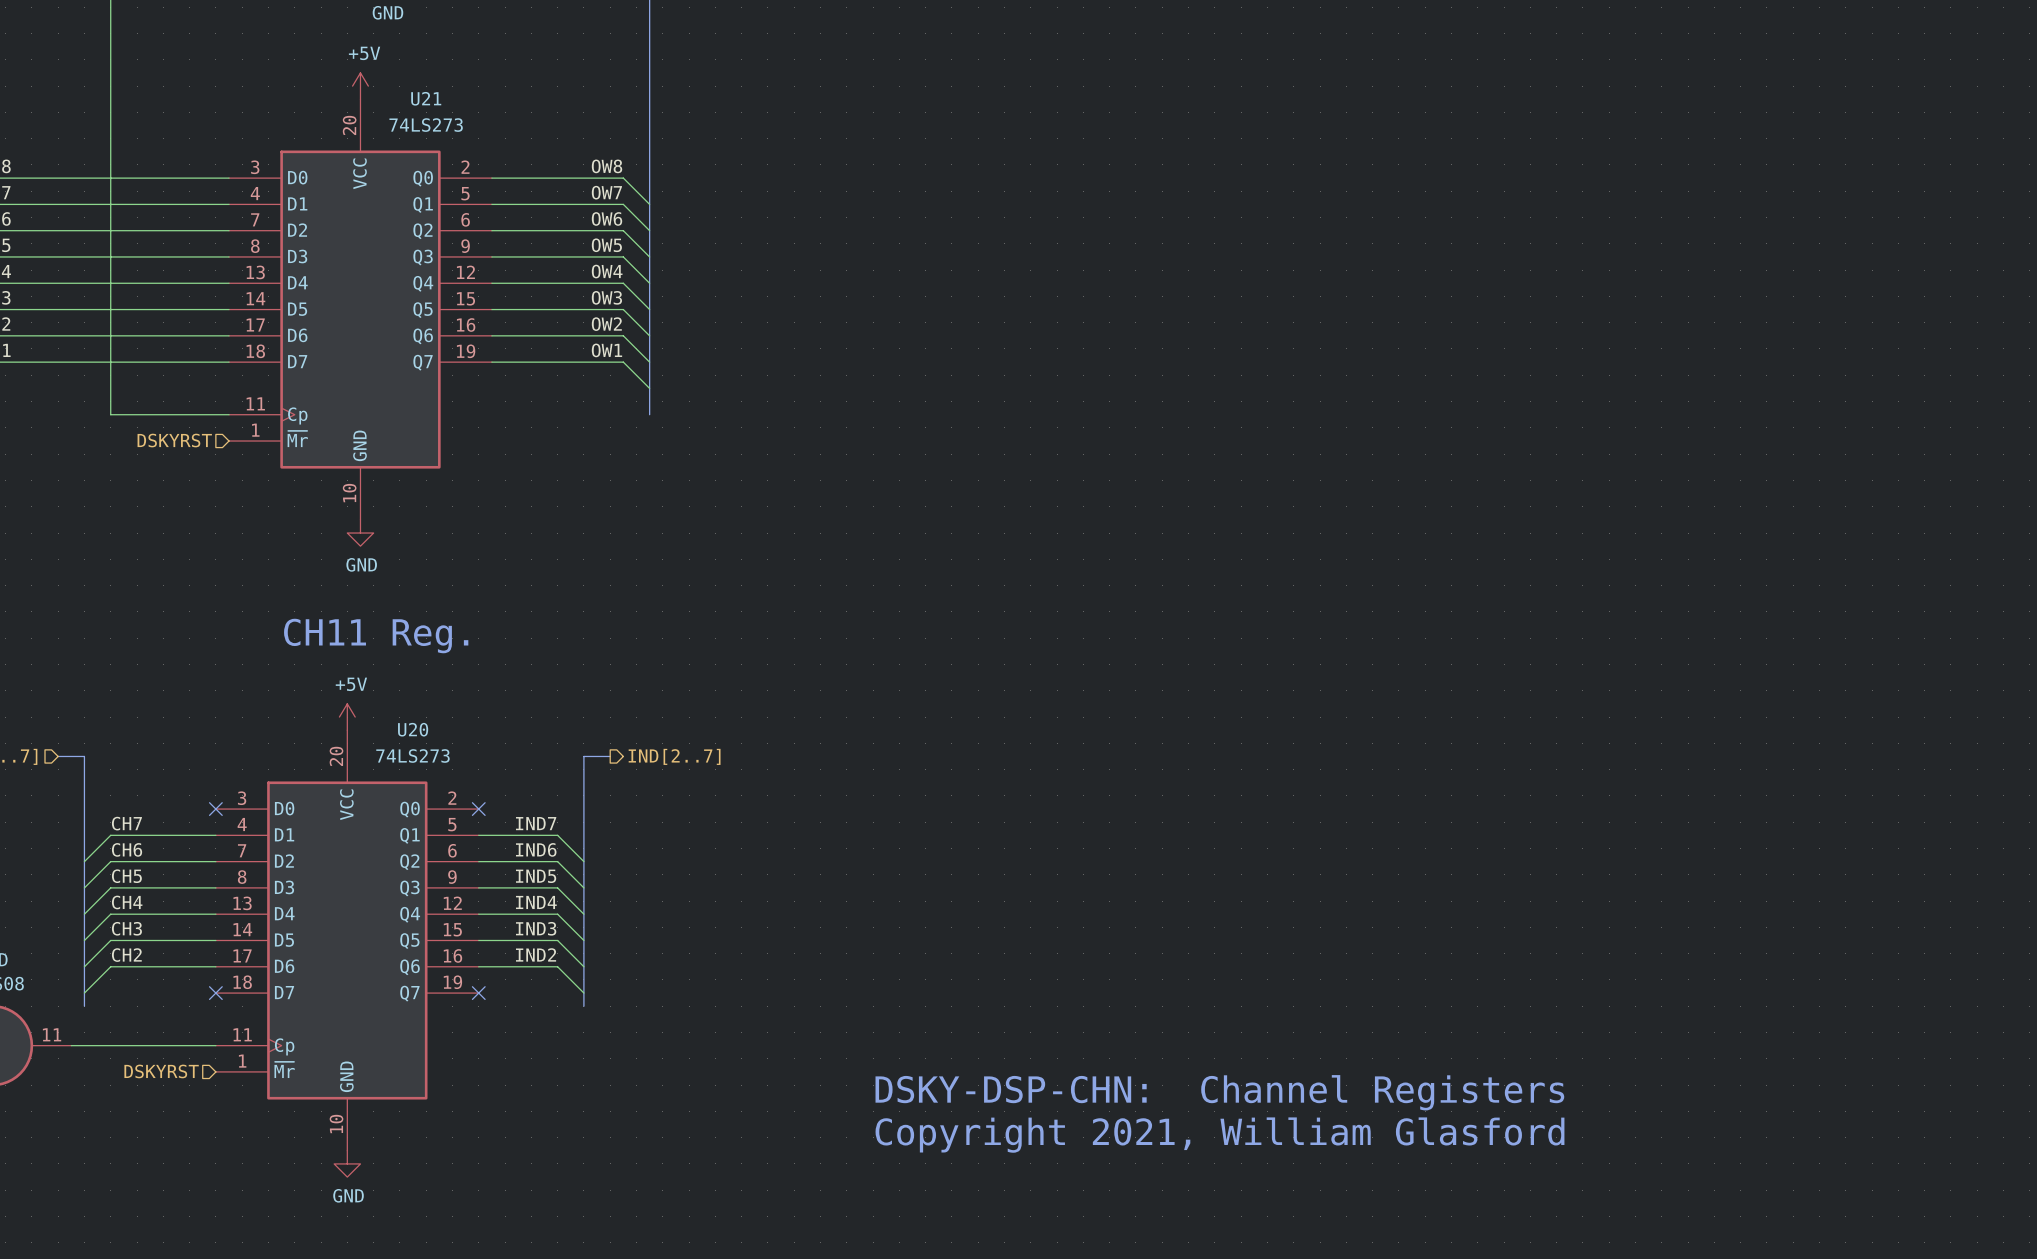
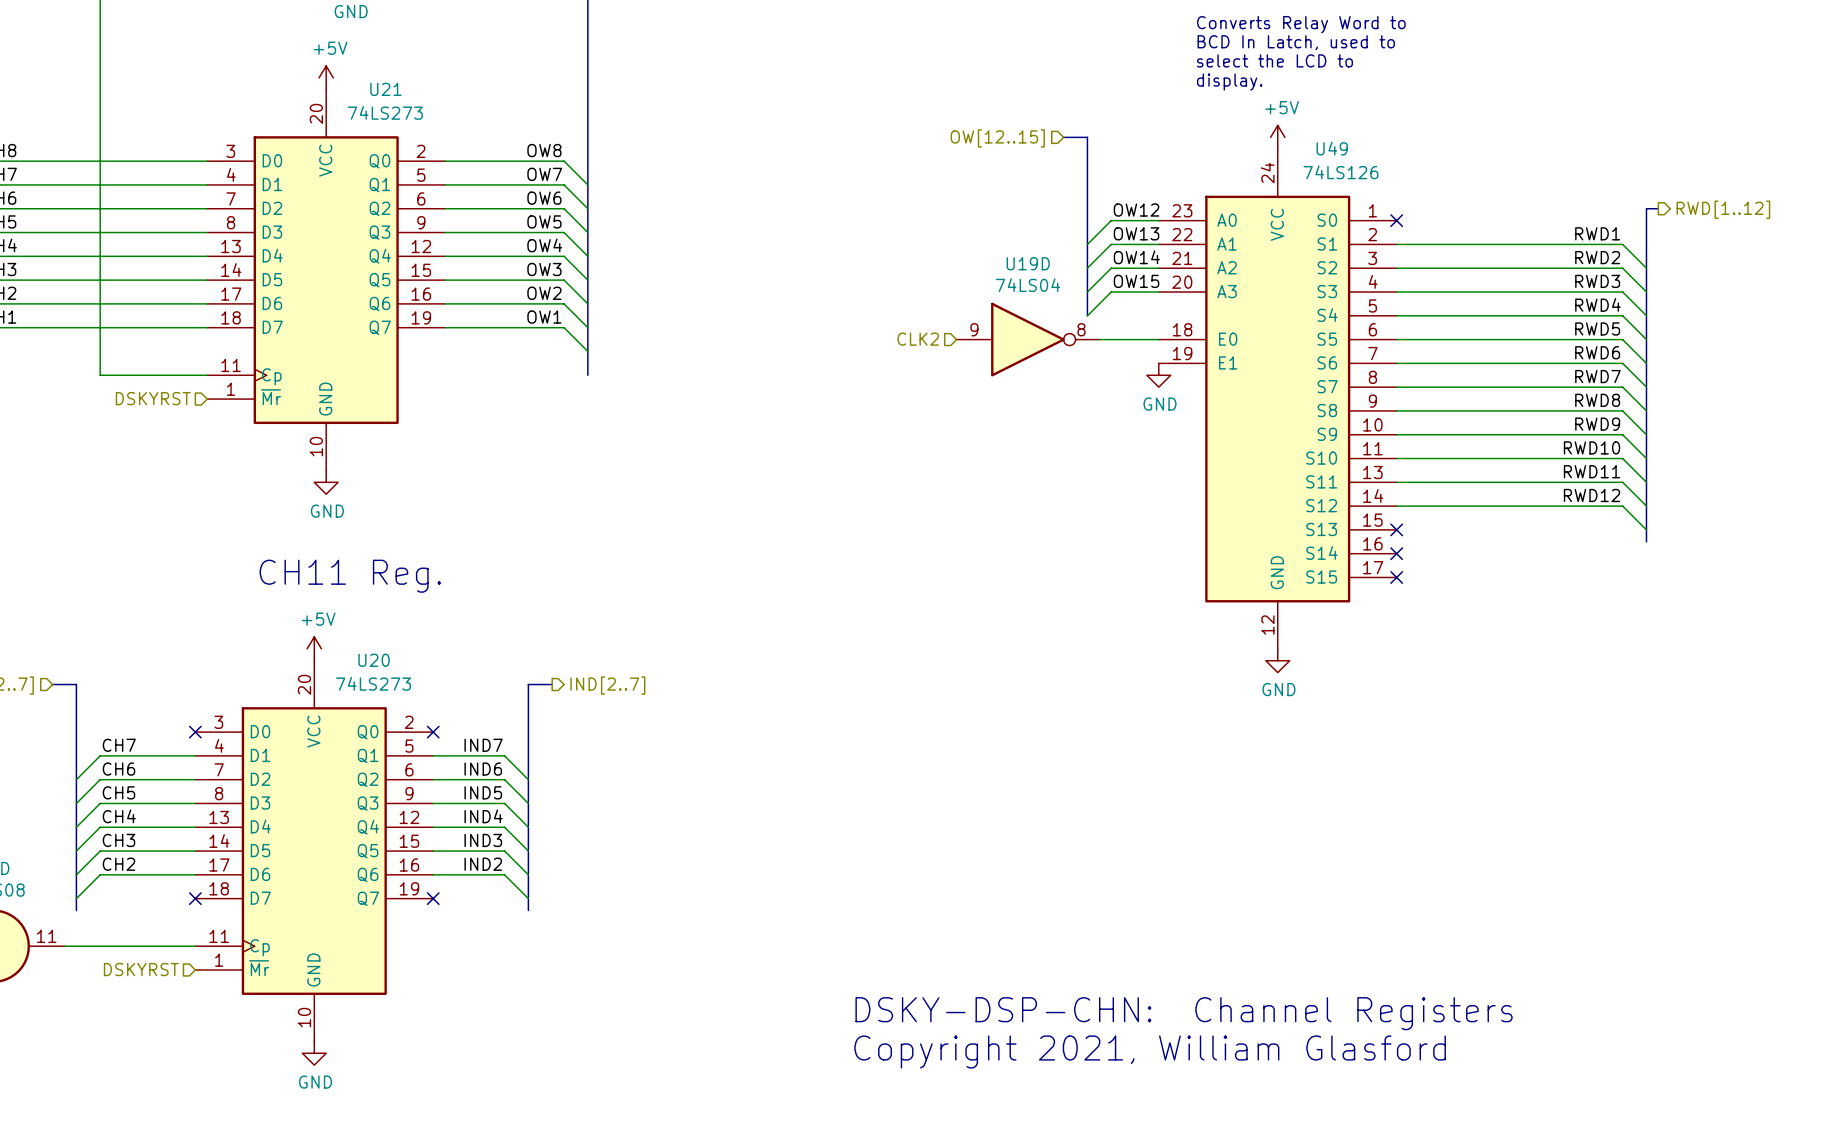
text: none -> Converts Relay Word to (1301, 24)
text: none -> BCD In Latch, used to (1296, 42)
text: none -> select the LCD to (1275, 60)
text: none -> display. (1229, 82)
bus: none -> (1063, 137) (1087, 137) (1087, 315)
power symbol: none -> +5V (1277, 137)
hierarchical label: none -> OW[12..15] (997, 138)
bus: none -> (1658, 208) (1646, 208) (1646, 541)
hierarchical label: none -> RWD[1..12] (1723, 209)
label: none -> OW12 (1136, 210)
wire: none -> (1158, 220) (1111, 220) (1087, 244)
no-connect mark: none -> (1396, 220)
label: none -> OW13 (1136, 233)
label: none -> RWD1 (1597, 233)
wire: none -> (1158, 244) (1111, 244) (1087, 268)
wire: none -> (1396, 244) (1622, 244) (1646, 268)
label: none -> OW14 (1136, 257)
label: none -> RWD2 (1597, 257)
wire: none -> (1158, 268) (1111, 268) (1087, 292)
wire: none -> (1396, 268) (1622, 268) (1646, 292)
label: none -> OW15 (1136, 281)
label: none -> RWD3 (1597, 281)
wire: none -> (1158, 292) (1111, 292) (1087, 315)
wire: none -> (1396, 292) (1622, 292) (1646, 315)
label: none -> RWD4 (1597, 304)
wire: none -> (1396, 315) (1622, 315) (1646, 339)
label: none -> RWD5 (1597, 328)
hierarchical label: none -> CLK2 (918, 339)
U19D: none -> 74LS04 (1027, 339)
wire: none -> (1099, 339) (1158, 339)
wire: none -> (1396, 339) (1622, 339) (1646, 363)
label: none -> RWD6 (1597, 352)
wire: none -> (1396, 363) (1622, 363) (1646, 387)
power symbol: none -> GND (1158, 375)
label: none -> RWD7 (1597, 376)
wire: none -> (1396, 387) (1622, 387) (1646, 410)
U49: none -> 74LS126 (1277, 399)
label: none -> RWD8 (1597, 400)
wire: none -> (1396, 410) (1622, 410) (1646, 434)
label: none -> RWD9 (1597, 424)
wire: none -> (1396, 434) (1622, 434) (1646, 458)
label: none -> RWD10 (1592, 447)
wire: none -> (1396, 458) (1622, 458) (1646, 482)
label: none -> RWD11 (1592, 471)
wire: none -> (1396, 482) (1622, 482) (1646, 506)
label: none -> RWD12 (1592, 495)
wire: none -> (1396, 506) (1622, 506) (1646, 529)
no-connect mark: none -> (1396, 529)
no-connect mark: none -> (1396, 553)
no-connect mark: none -> (1396, 577)
power symbol: none -> GND (1277, 660)
text position: DSKY-DSP-CHN: Channel Registers (1219, 1092) -> DSKY-DSP-CHN: Channel Registers (1184, 1013)
text position: Copyright 2021, William Glasford (1219, 1135) -> Copyright 2021, William Glasford (1150, 1051)

